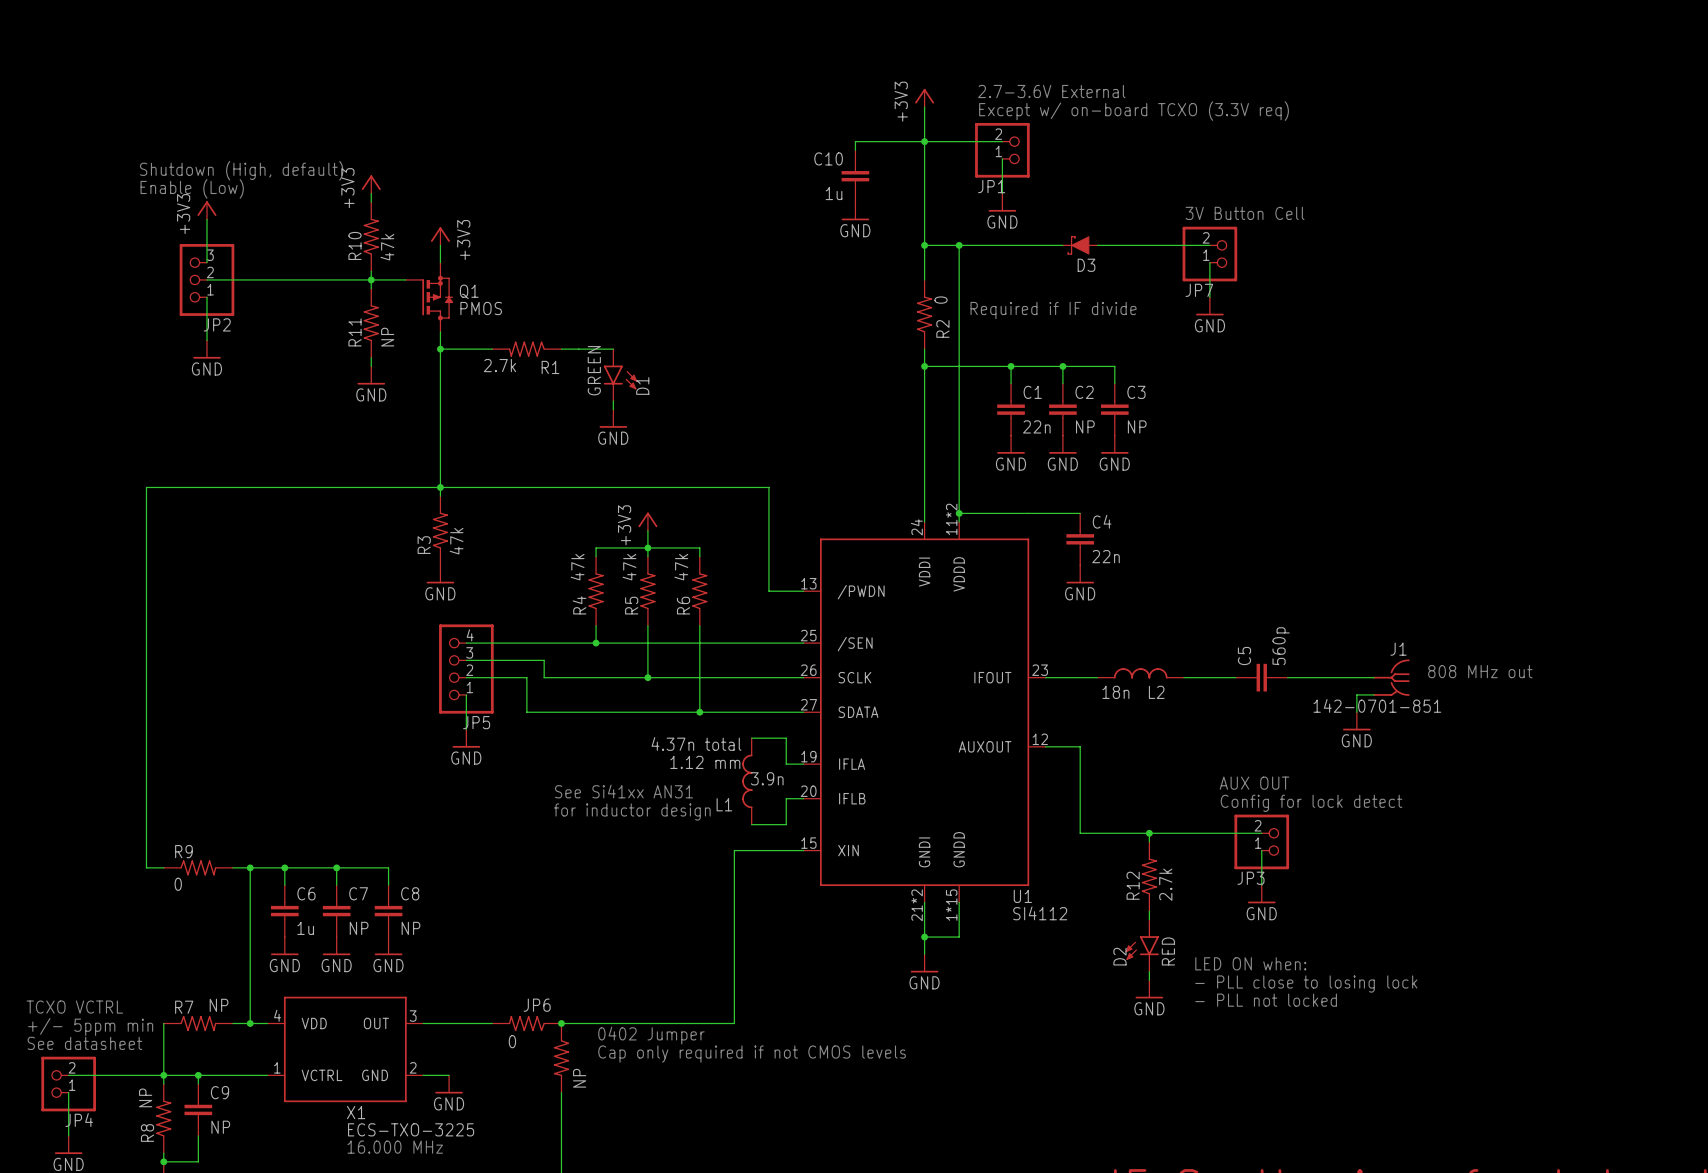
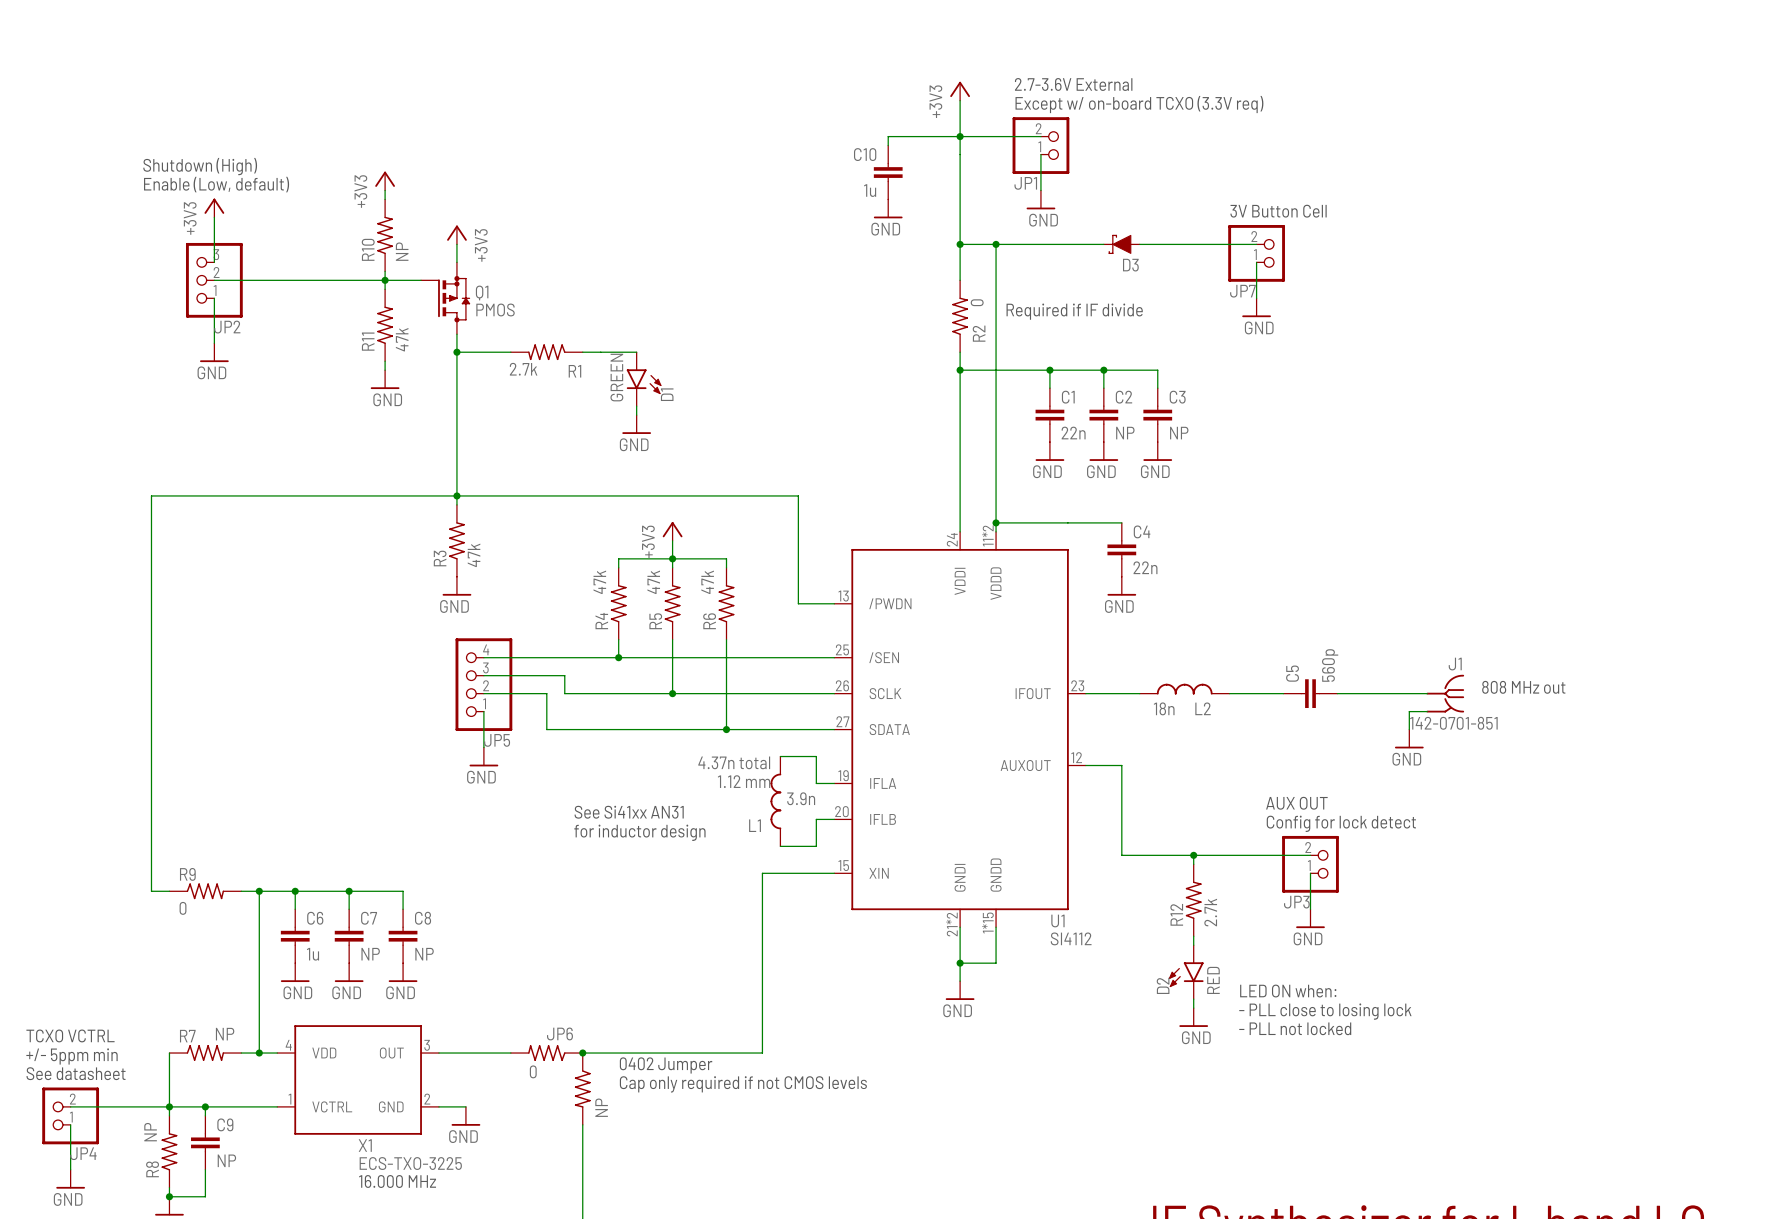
text: Shutdown (High, default) (241, 170) -> Shutdown (High) (200, 166)
text: Enable (Low) (192, 188) -> Enable (Low, default) (216, 184)
R10 value: 47k (387, 247) -> NP (402, 251)
R11 value: NP (387, 337) -> 47k (402, 339)

